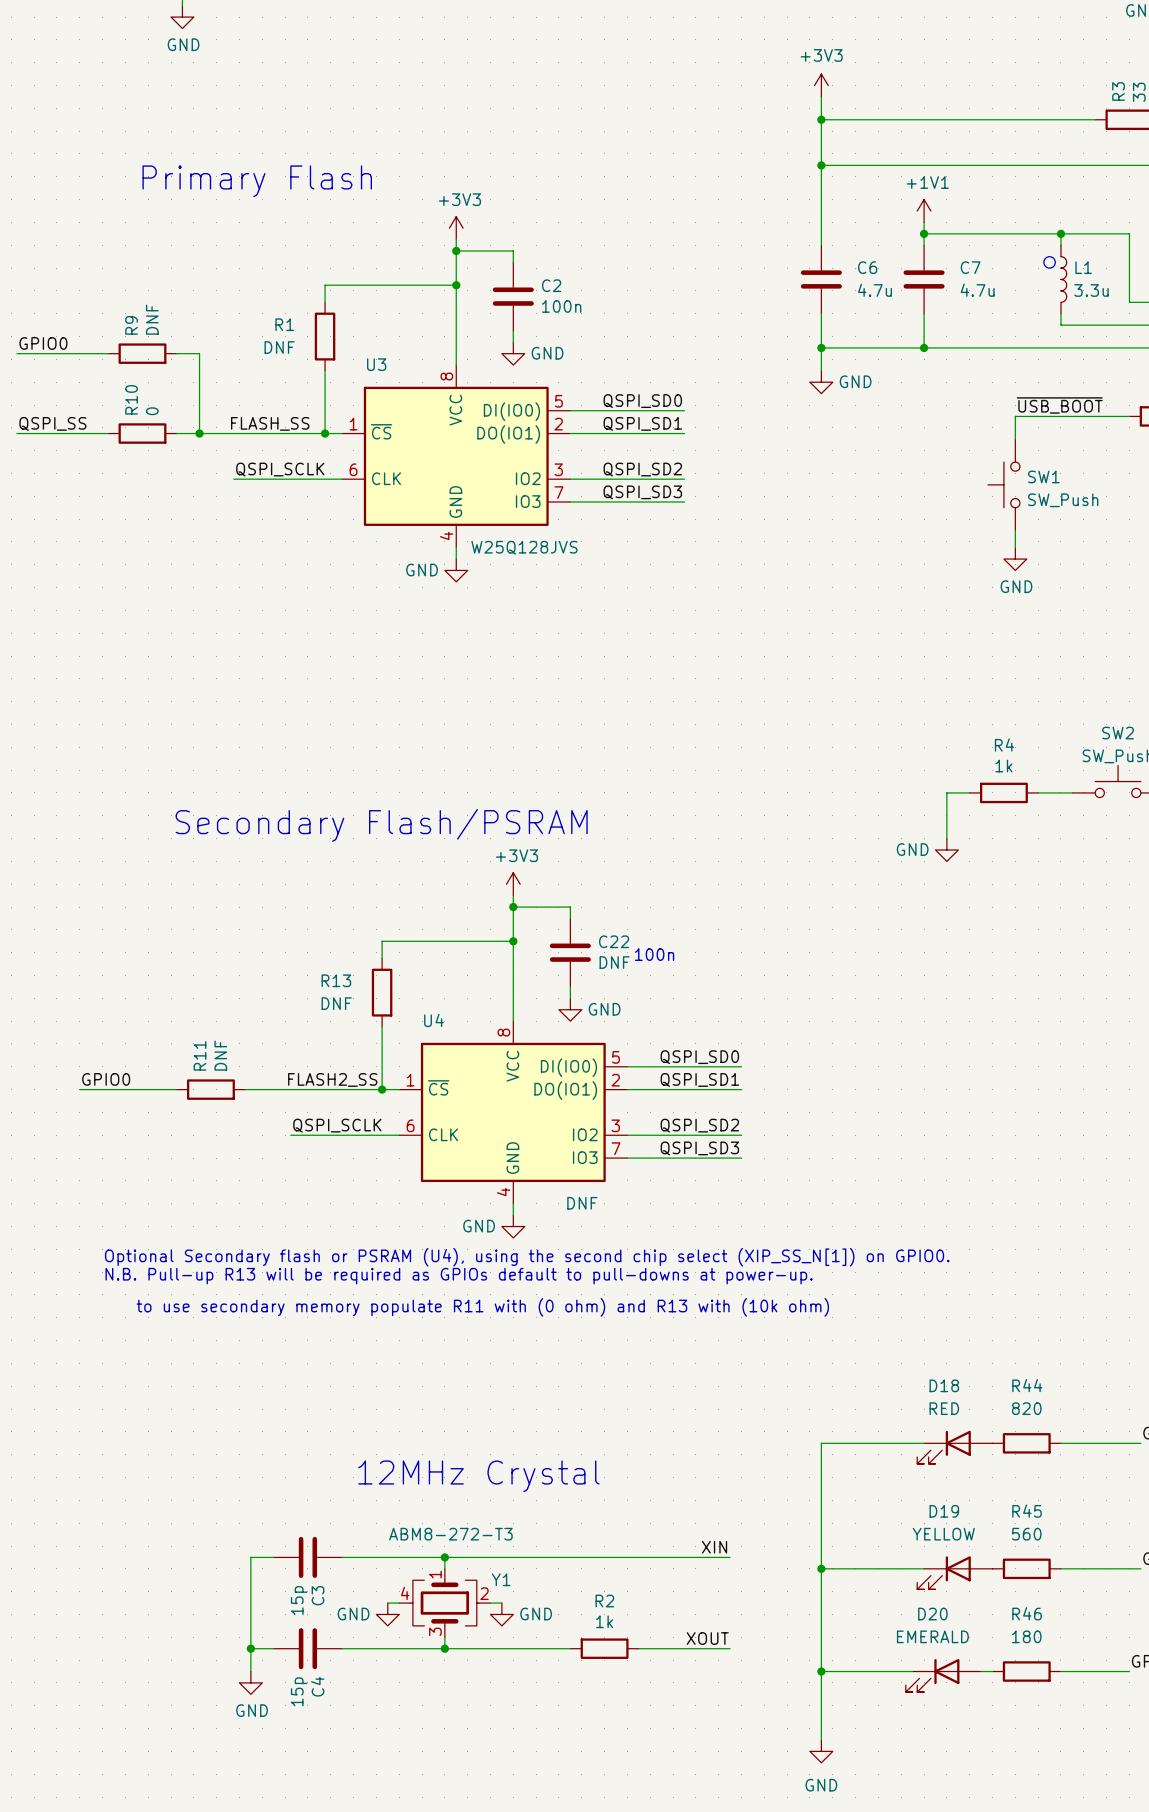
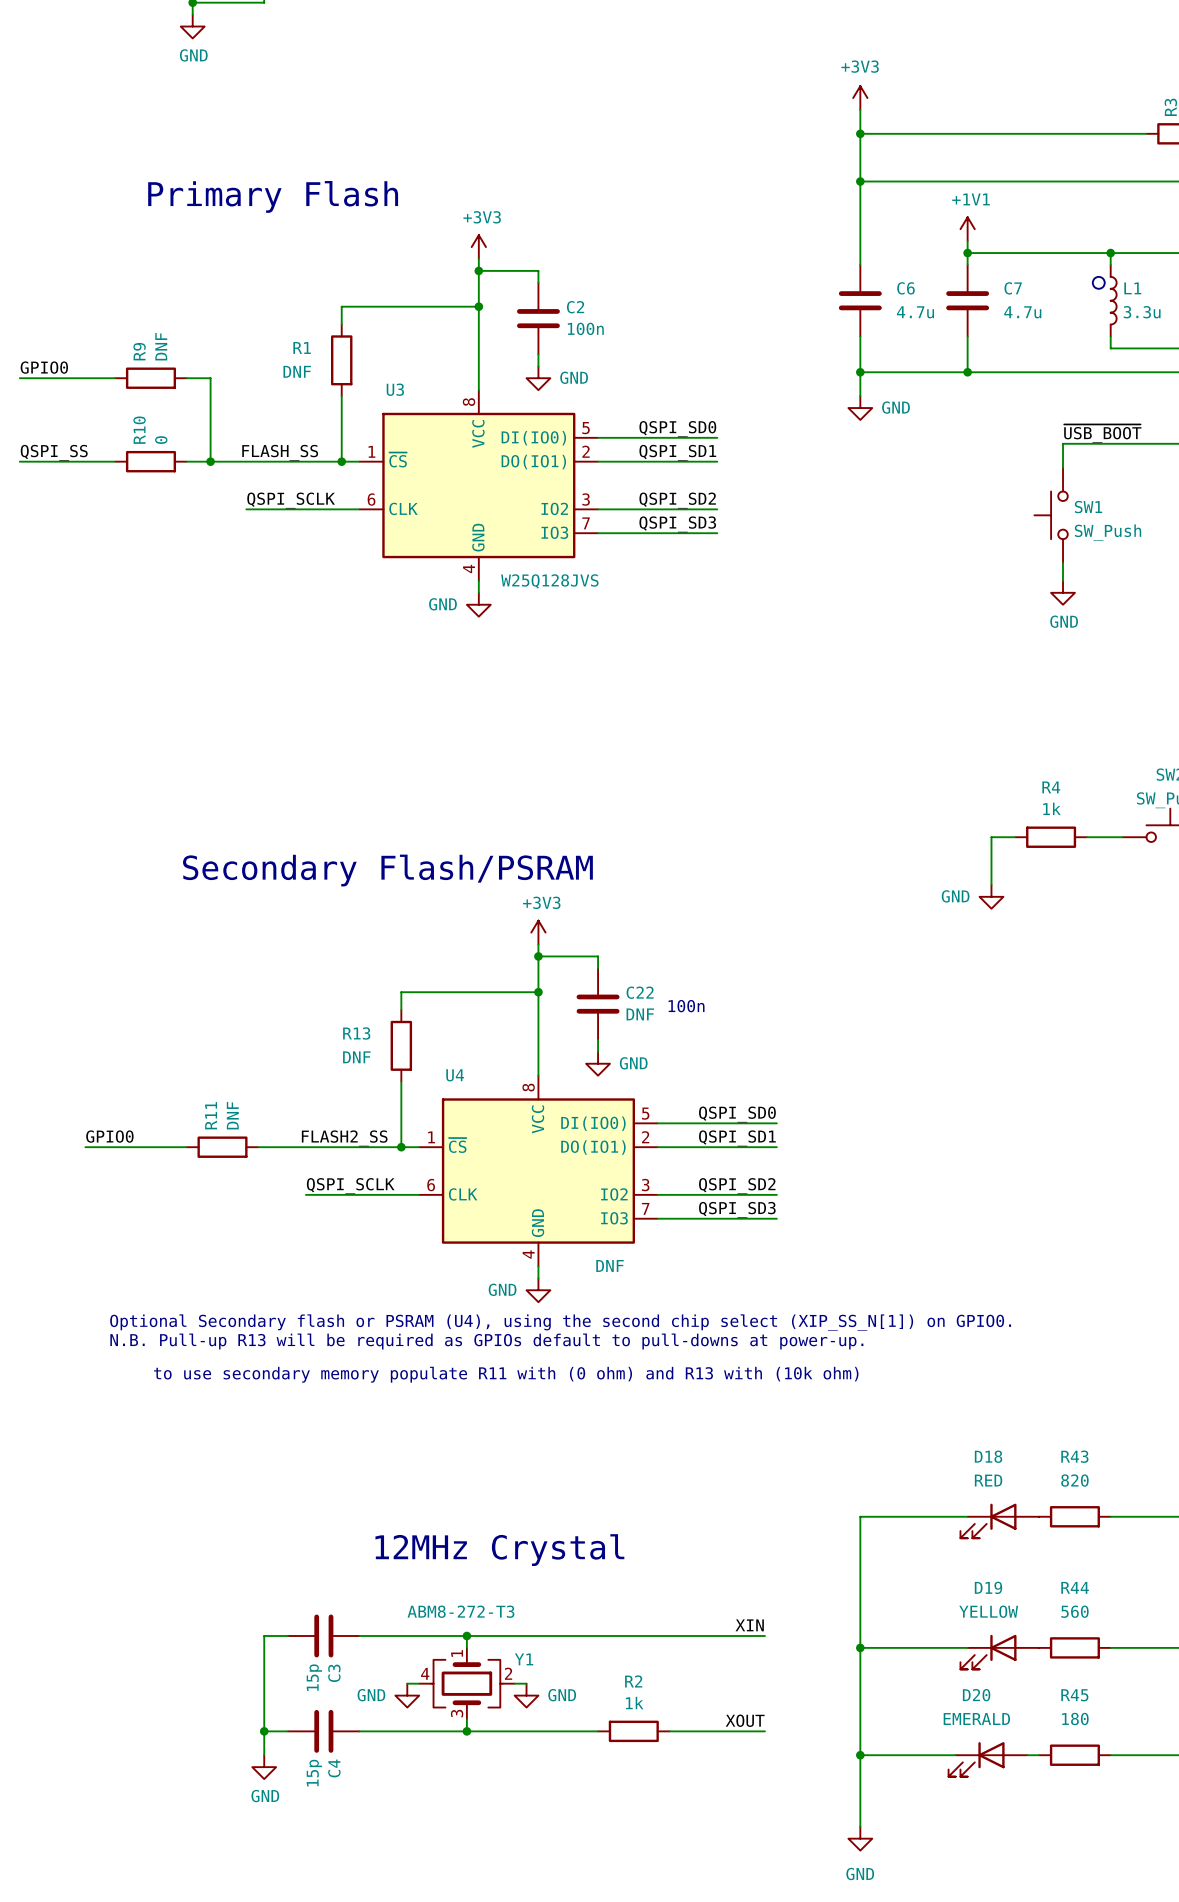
R44 name: R44 (1027, 1385) -> R43 (1074, 1456)
R45 name: R45 (1027, 1511) -> R44 (1075, 1587)
R46 name: R46 (1027, 1613) -> R45 (1074, 1695)

